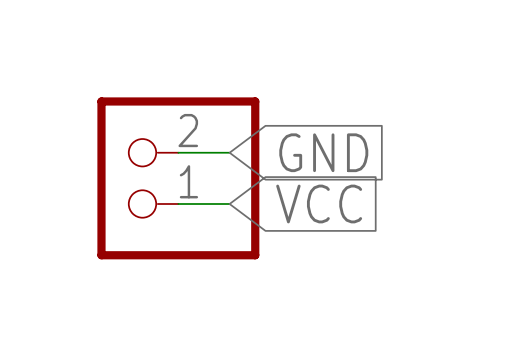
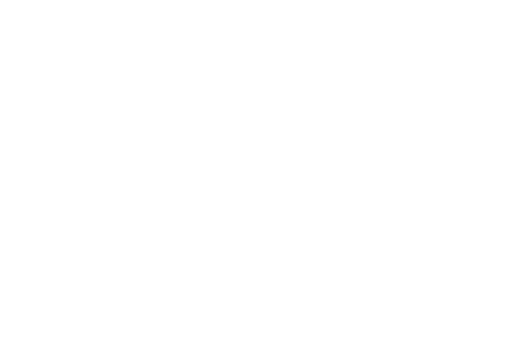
wire: (178, 152) (229, 152) -> none
global label: GND (323, 152) -> none
part: (178, 178) -> none
wire: (178, 203) (229, 203) -> none
global label: VCC (319, 203) -> none

